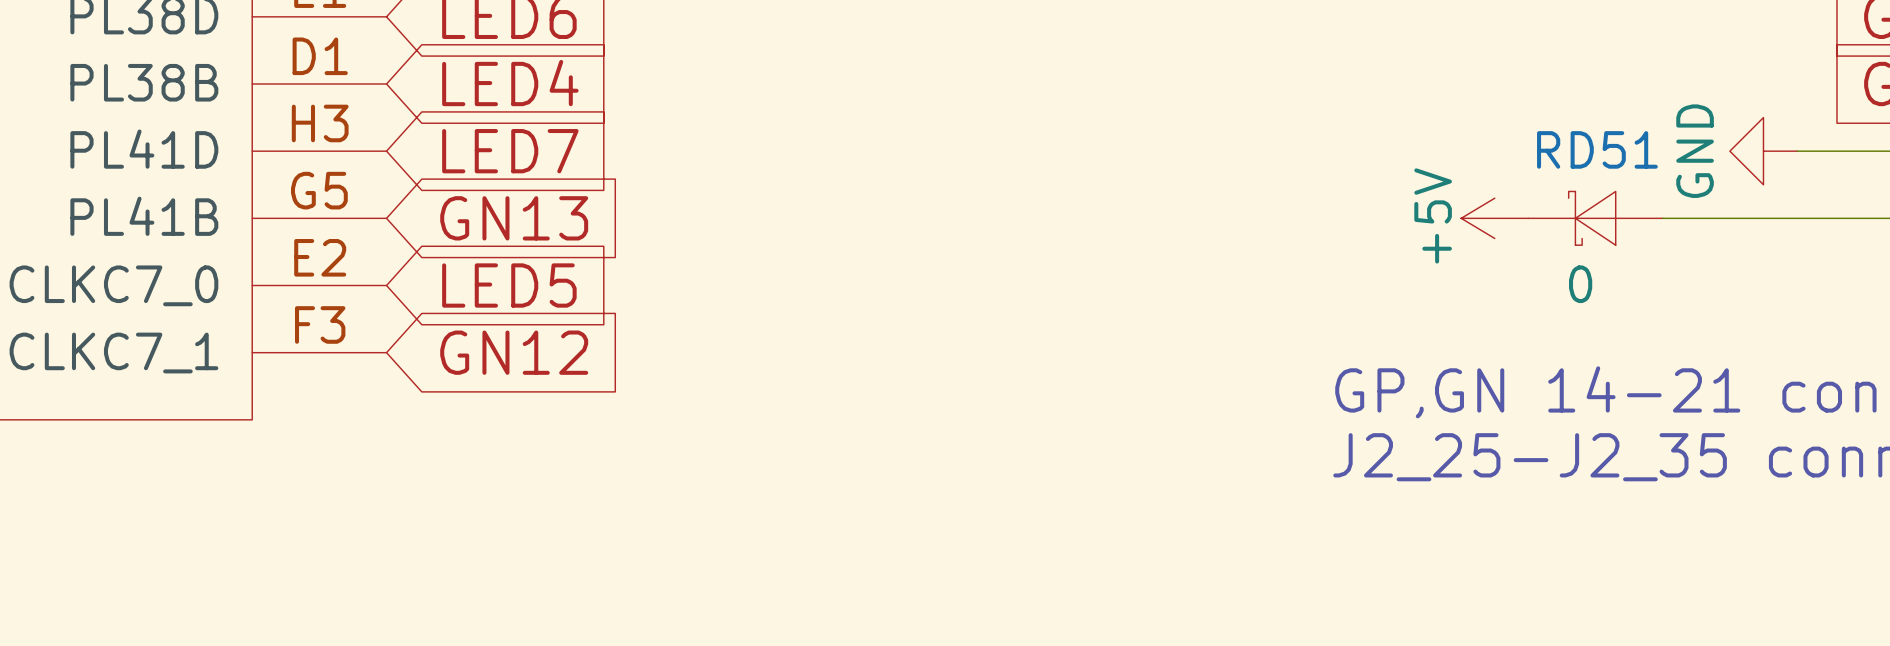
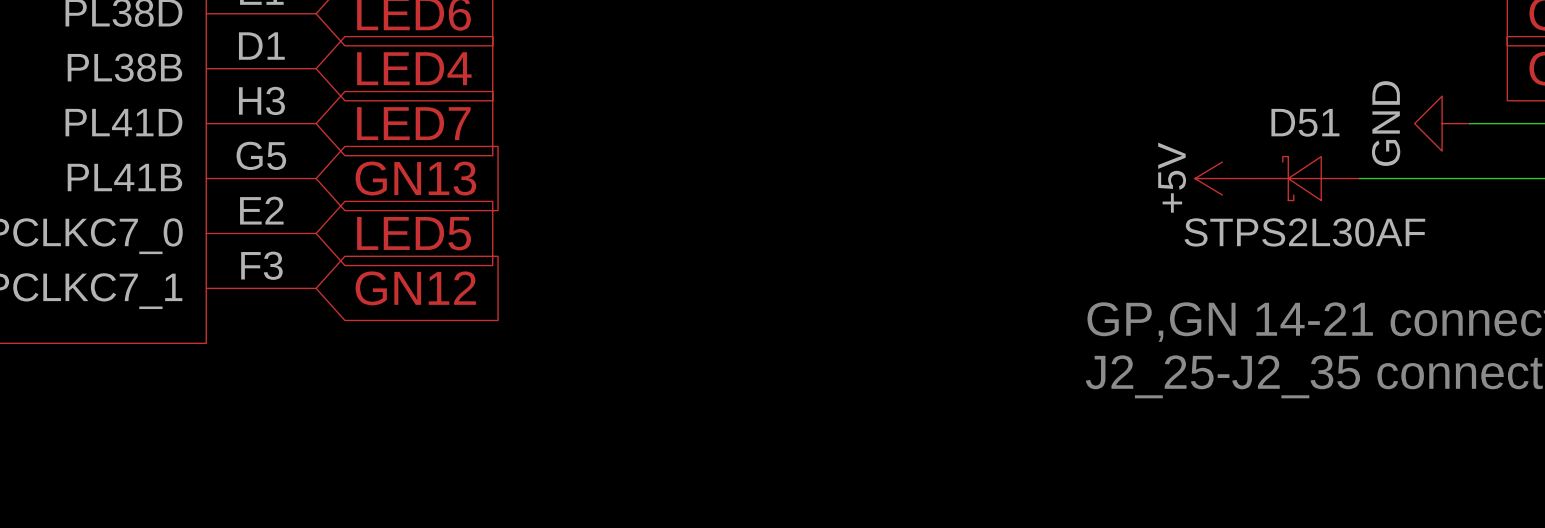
RD51 name: RD51 (1597, 149) -> D51 (1305, 122)
RD51 value: 0 (1580, 284) -> STPS2L30AF (1304, 232)

